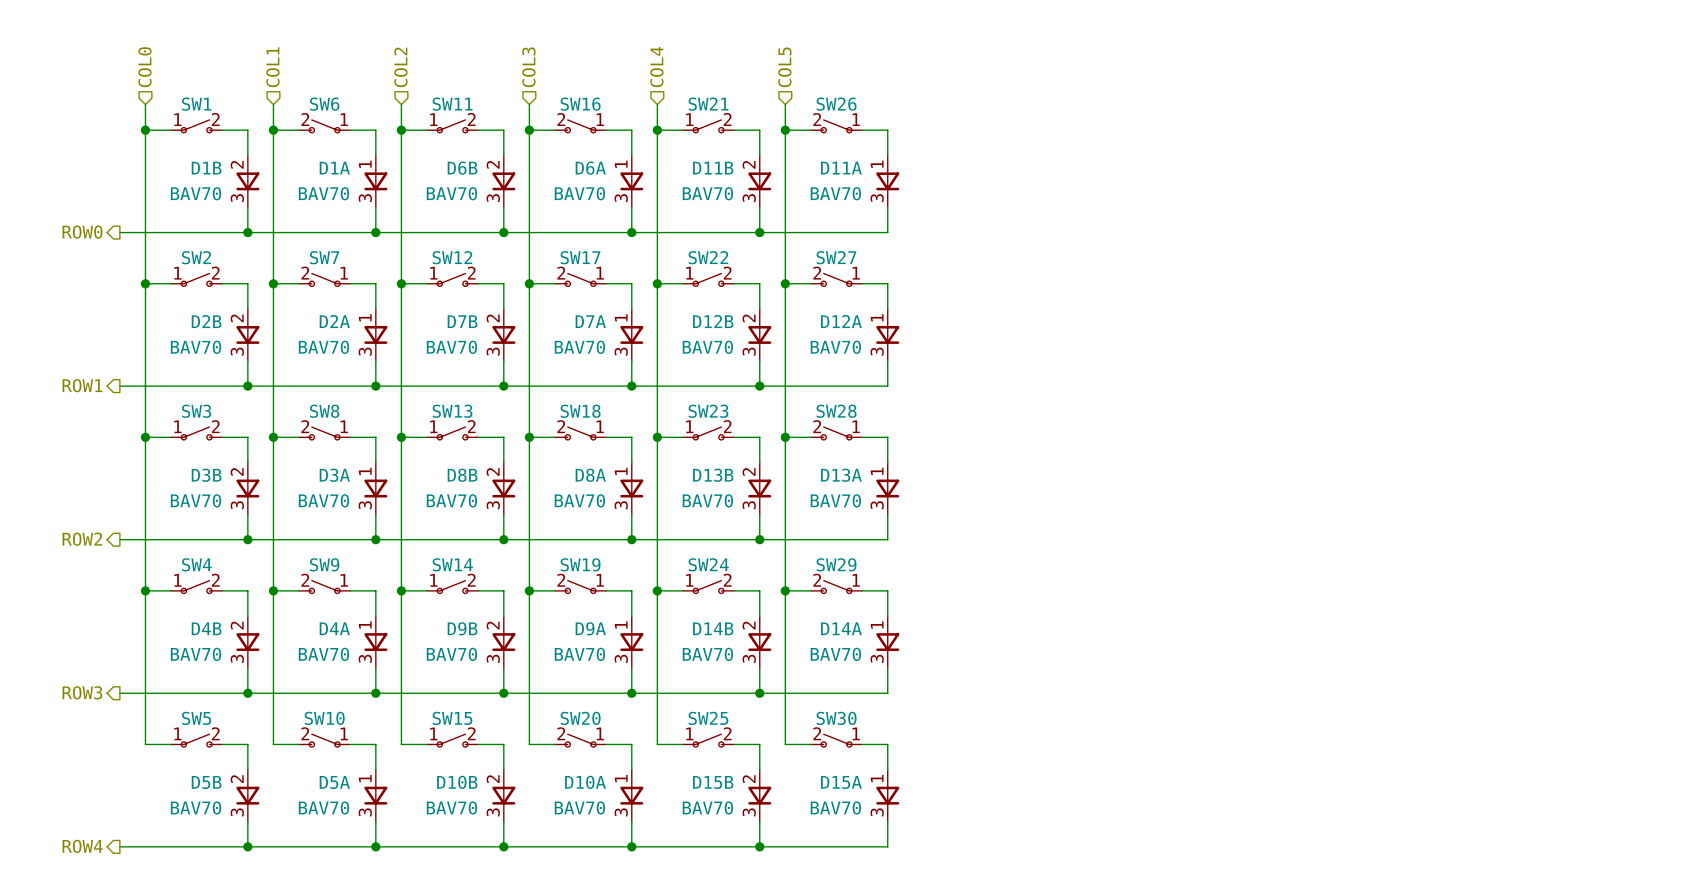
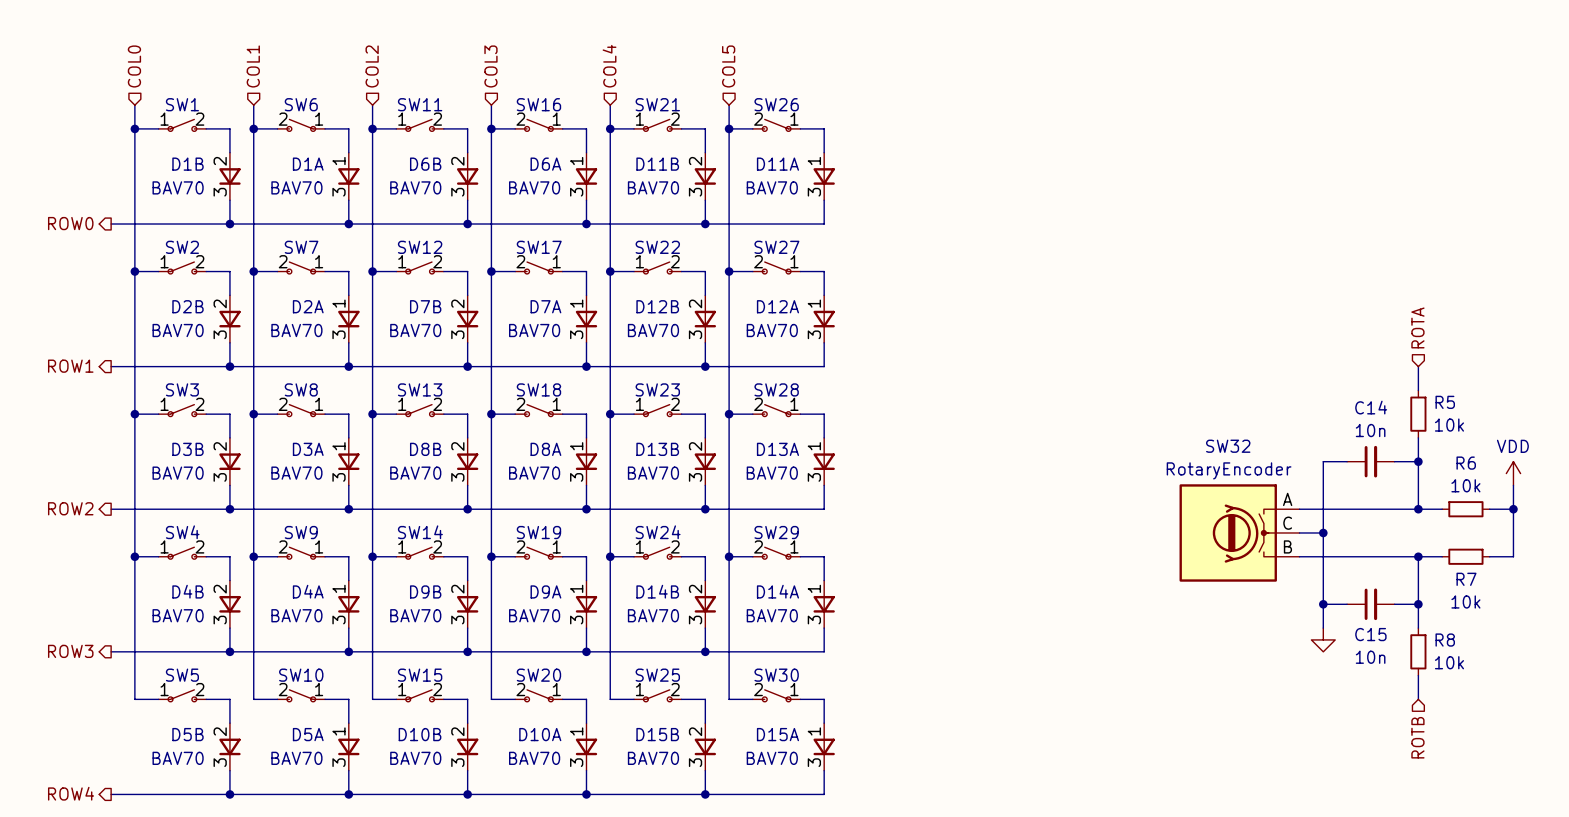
hierarchical label: none -> ROTA (1417, 327)
wire: none -> (1418, 366) (1418, 390)
R5: none -> 10k (1418, 414)
wire: none -> (1418, 437) (1418, 509)
wire: none -> (1347, 461) (1323, 461) (1323, 628)
C14: none -> 10n (1370, 461)
wire: none -> (1394, 461) (1418, 461)
junction: none -> (1418, 461)
power symbol: none -> VDD (1513, 473)
wire: none -> (1513, 485) (1513, 556) (1489, 556)
wire: none -> (1299, 509) (1442, 509)
junction: none -> (1418, 509)
R6: none -> 10k (1465, 509)
wire: none -> (1489, 509) (1513, 509)
junction: none -> (1513, 509)
SW32: none -> RotaryEncoder (1239, 532)
wire: none -> (1299, 532) (1323, 532)
junction: none -> (1323, 532)
wire: none -> (1299, 556) (1442, 556)
wire: none -> (1418, 556) (1418, 628)
junction: none -> (1418, 556)
R7: none -> 10k (1465, 556)
wire: none -> (1323, 604) (1347, 604)
junction: none -> (1323, 604)
C15: none -> 10n (1370, 604)
wire: none -> (1394, 604) (1418, 604)
junction: none -> (1418, 604)
power symbol: none -> (1323, 639)
R8: none -> 10k (1418, 651)
wire: none -> (1418, 675) (1418, 699)
hierarchical label: none -> ROTB (1417, 737)

